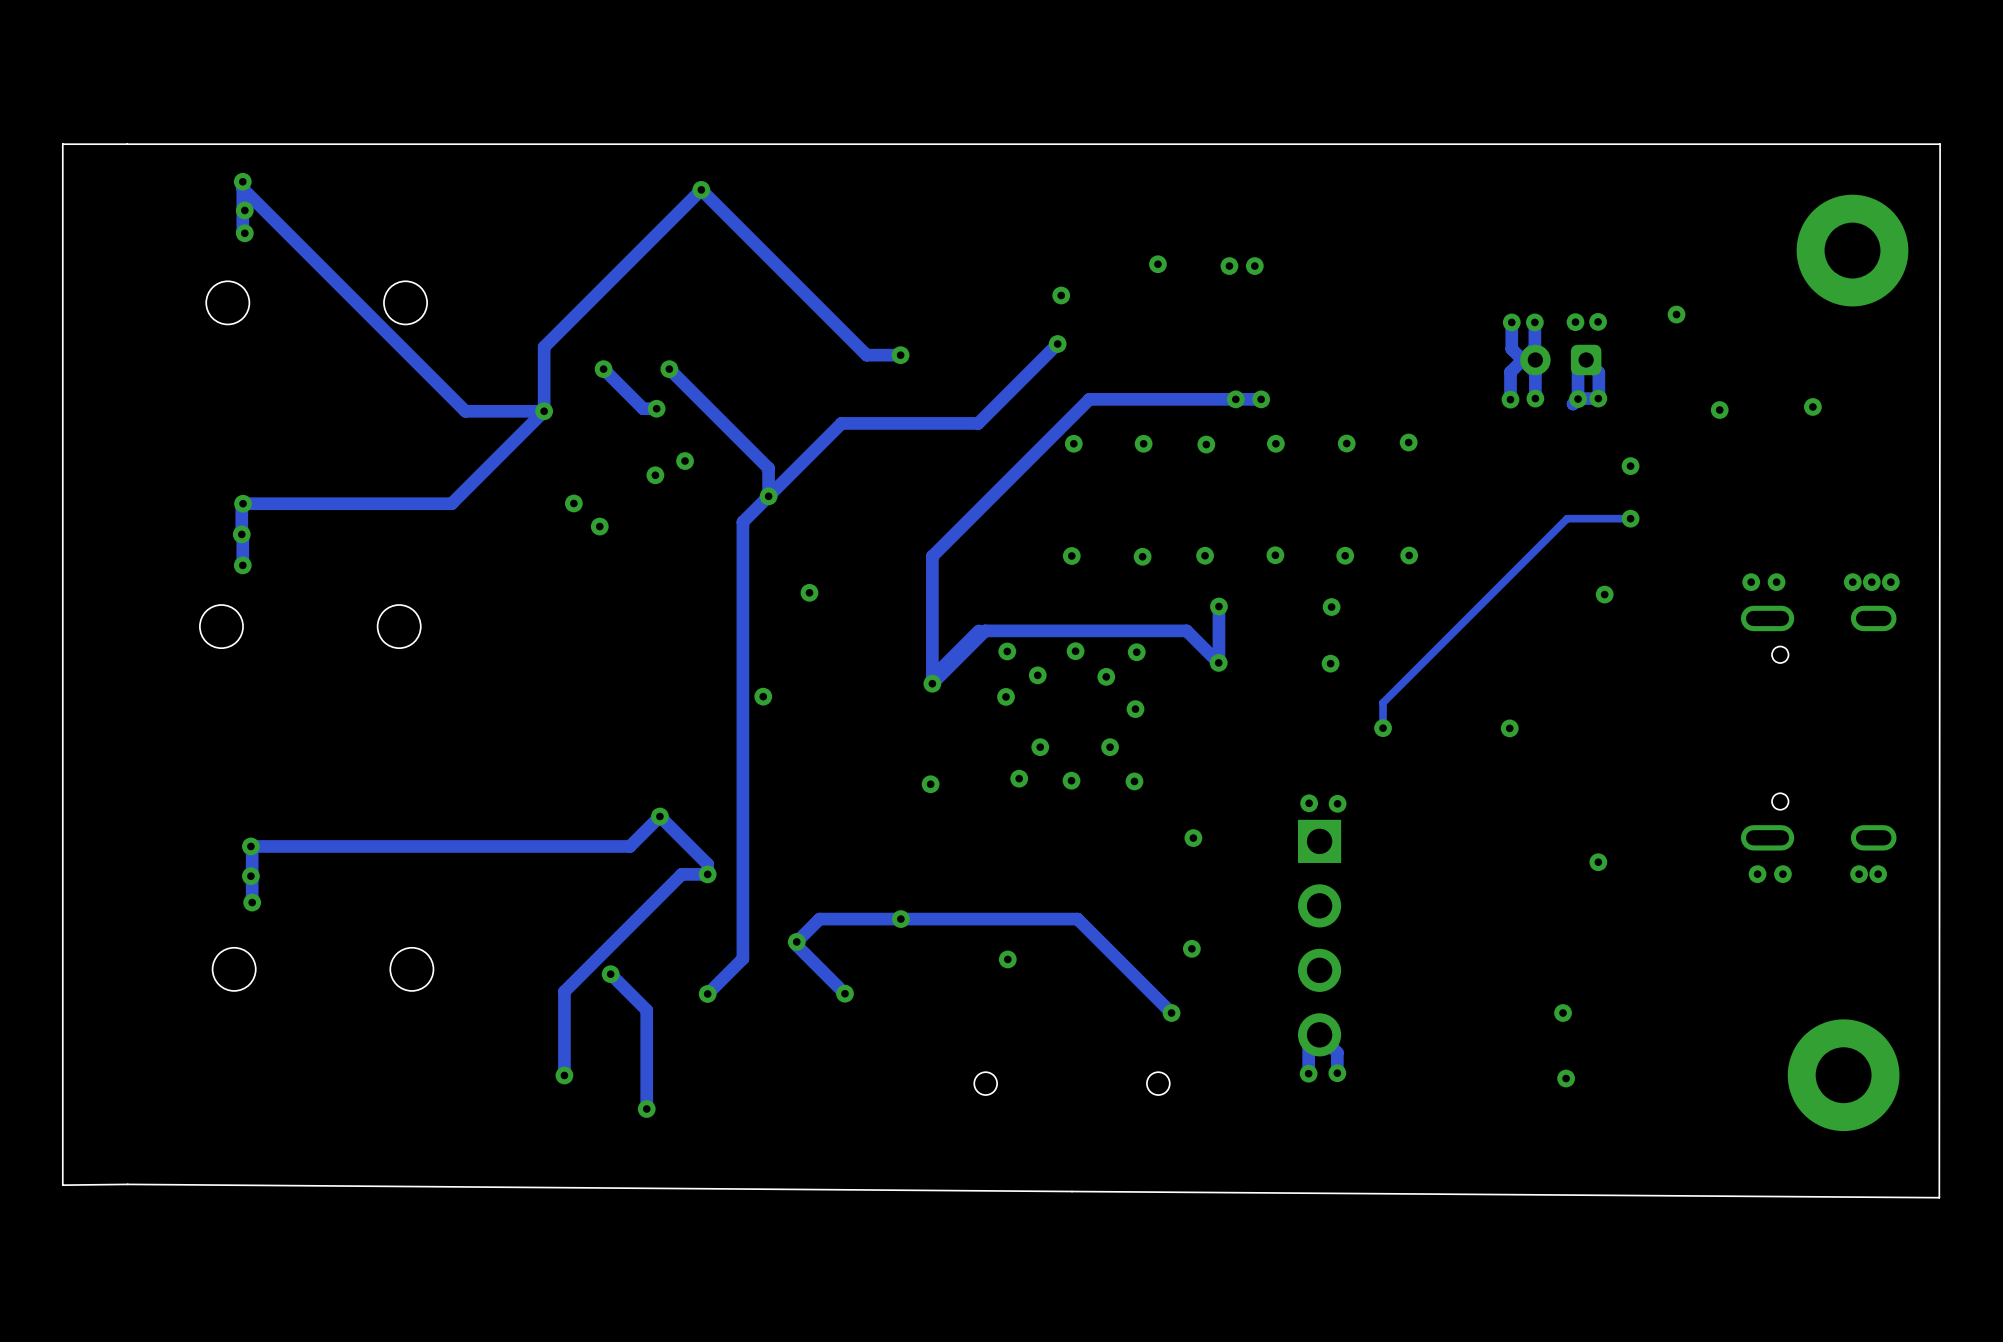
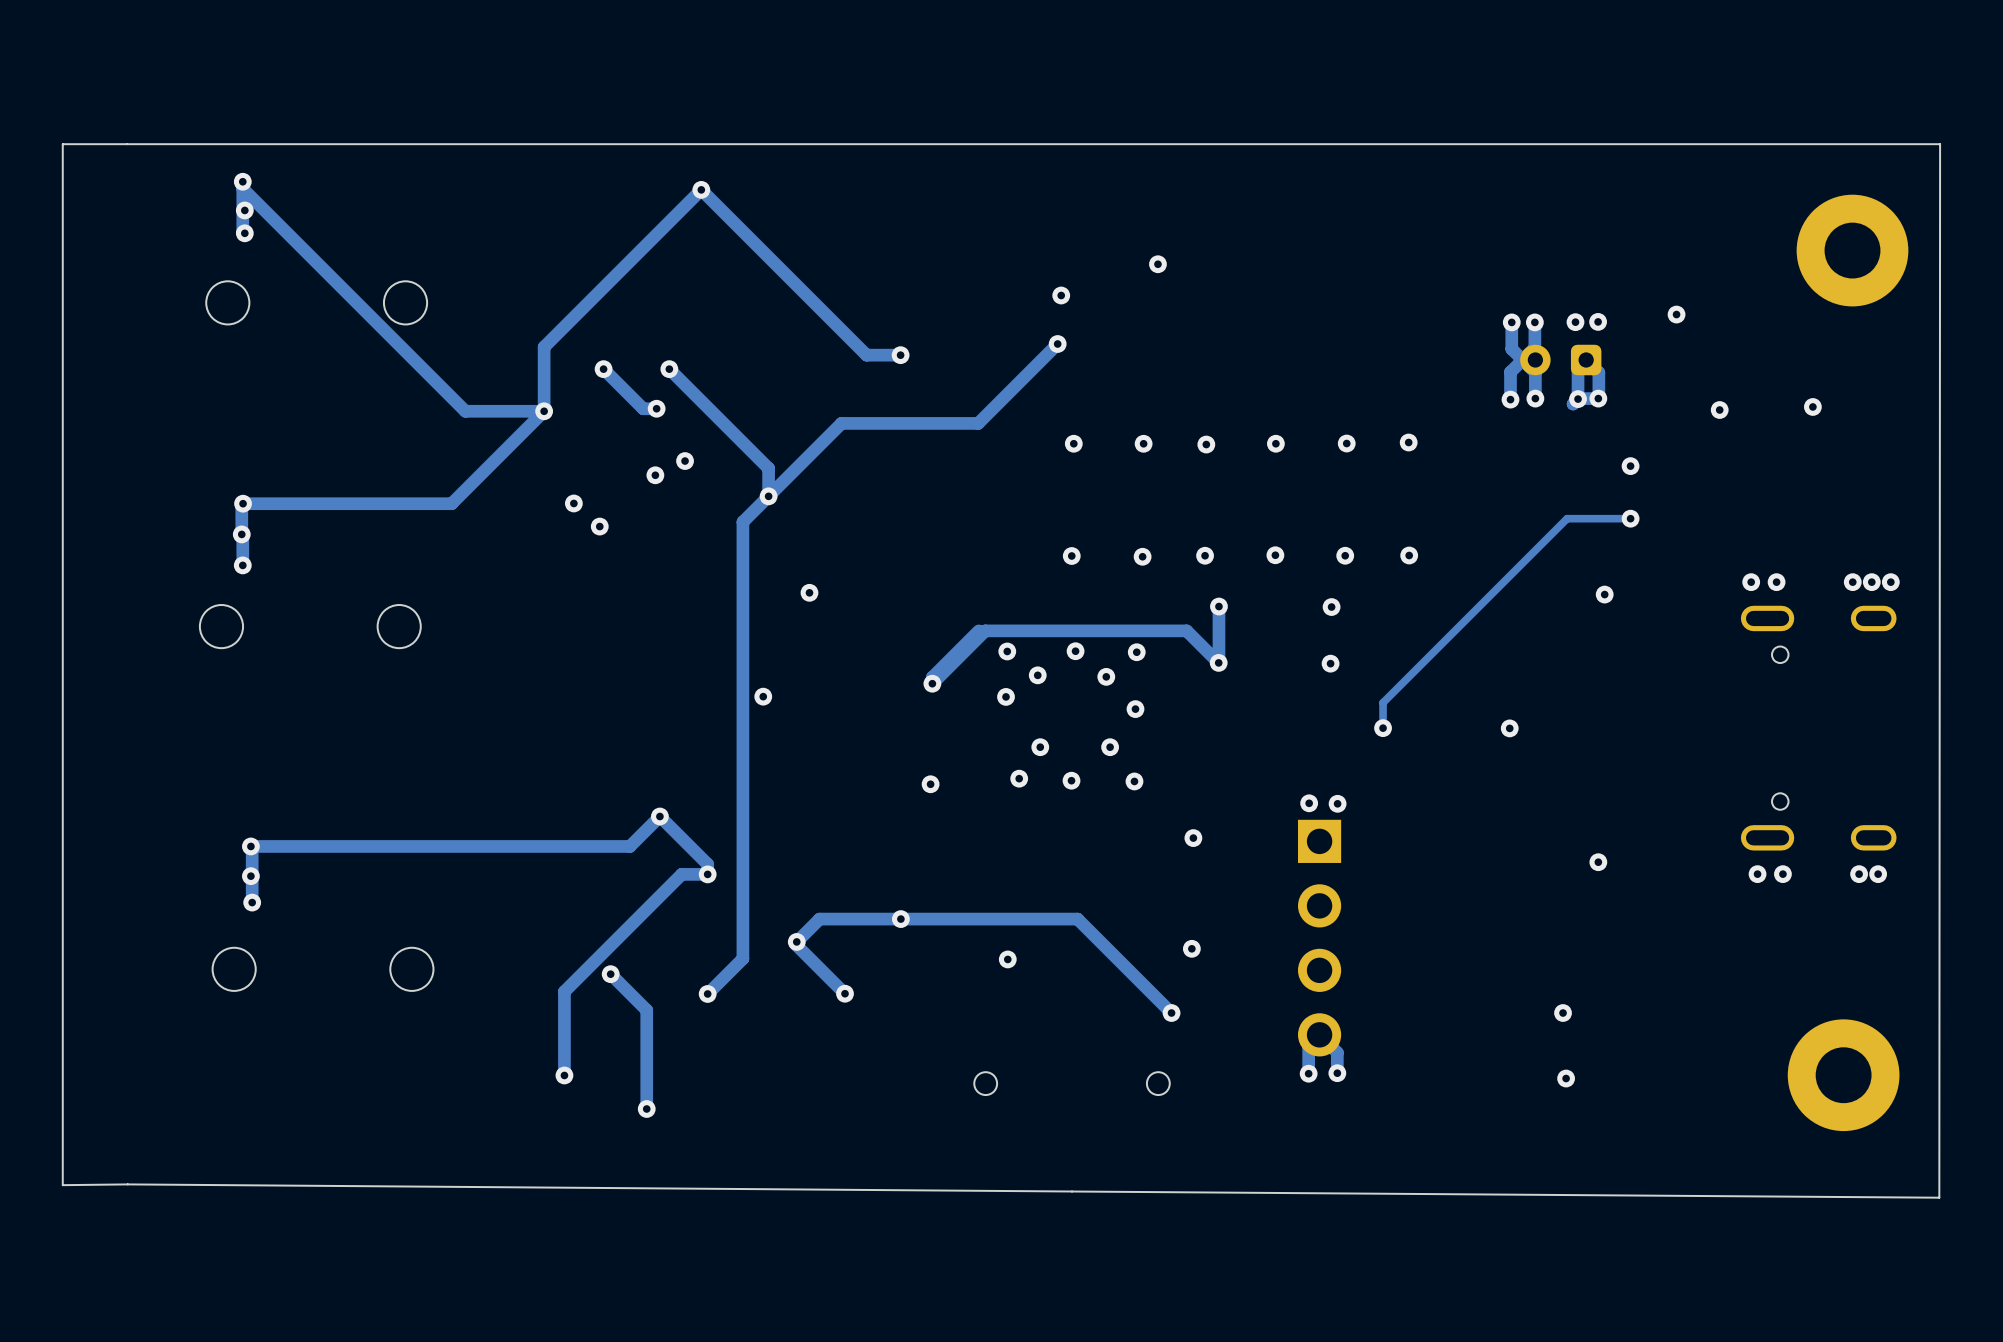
via: (1229, 266) -> none
via: (1254, 266) -> none
via: (1235, 399) -> none
track: (1261, 399) (1089, 399) (932, 556) (932, 677) -> none
via: (1261, 399) -> none

